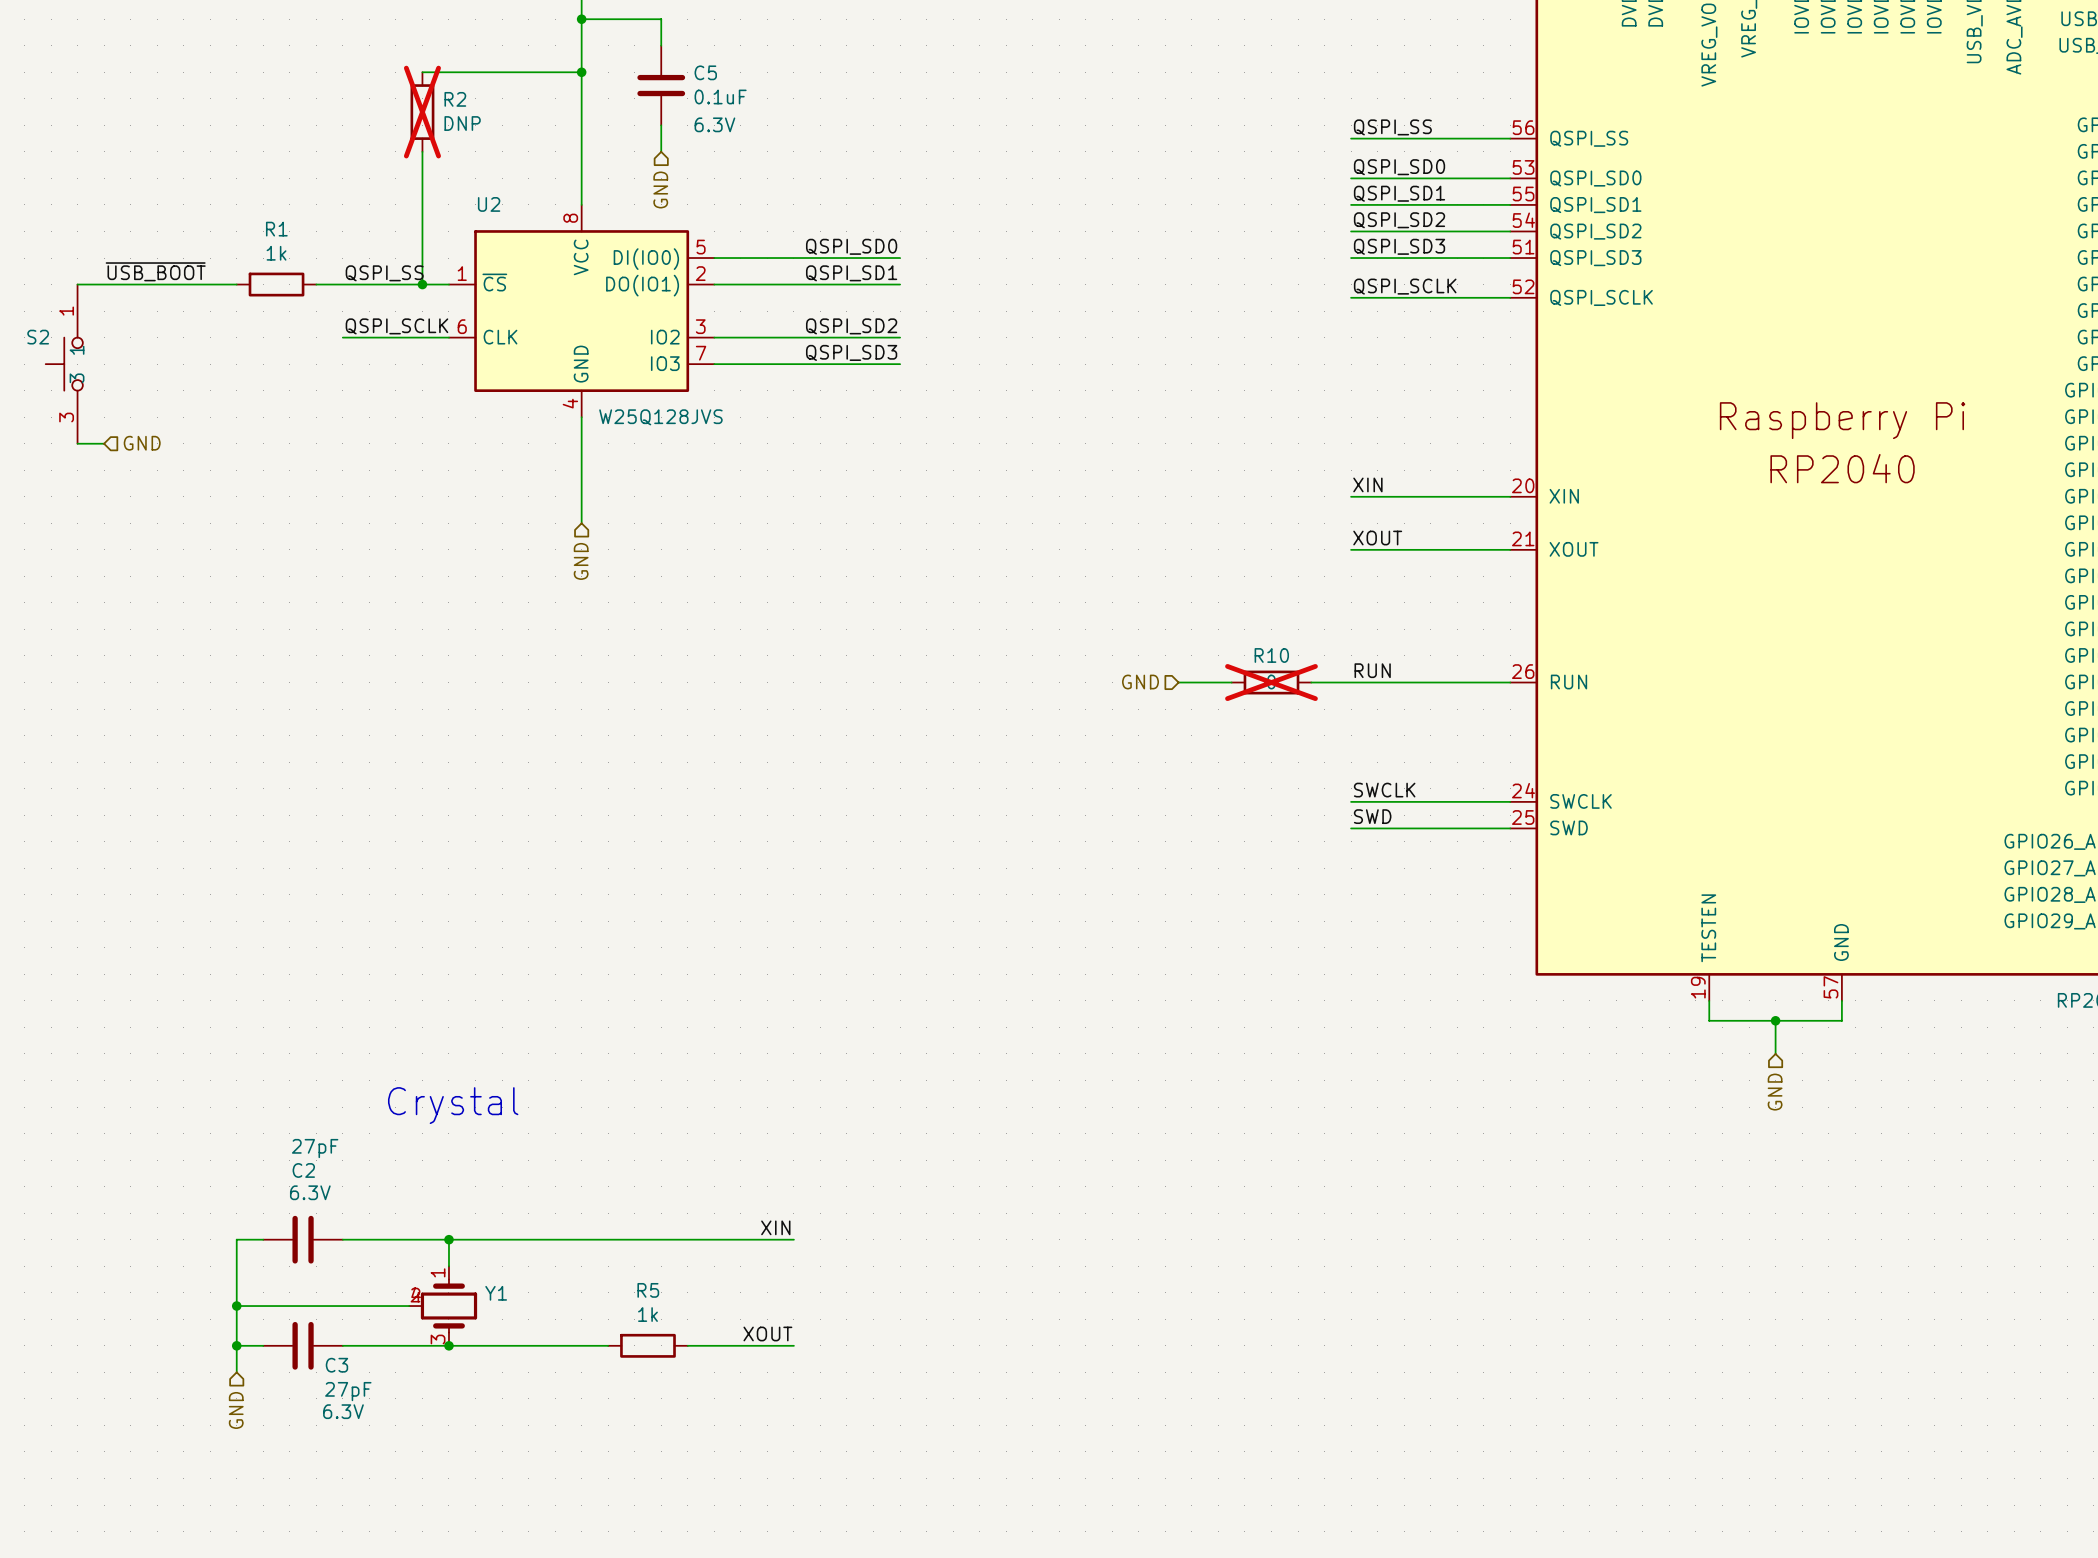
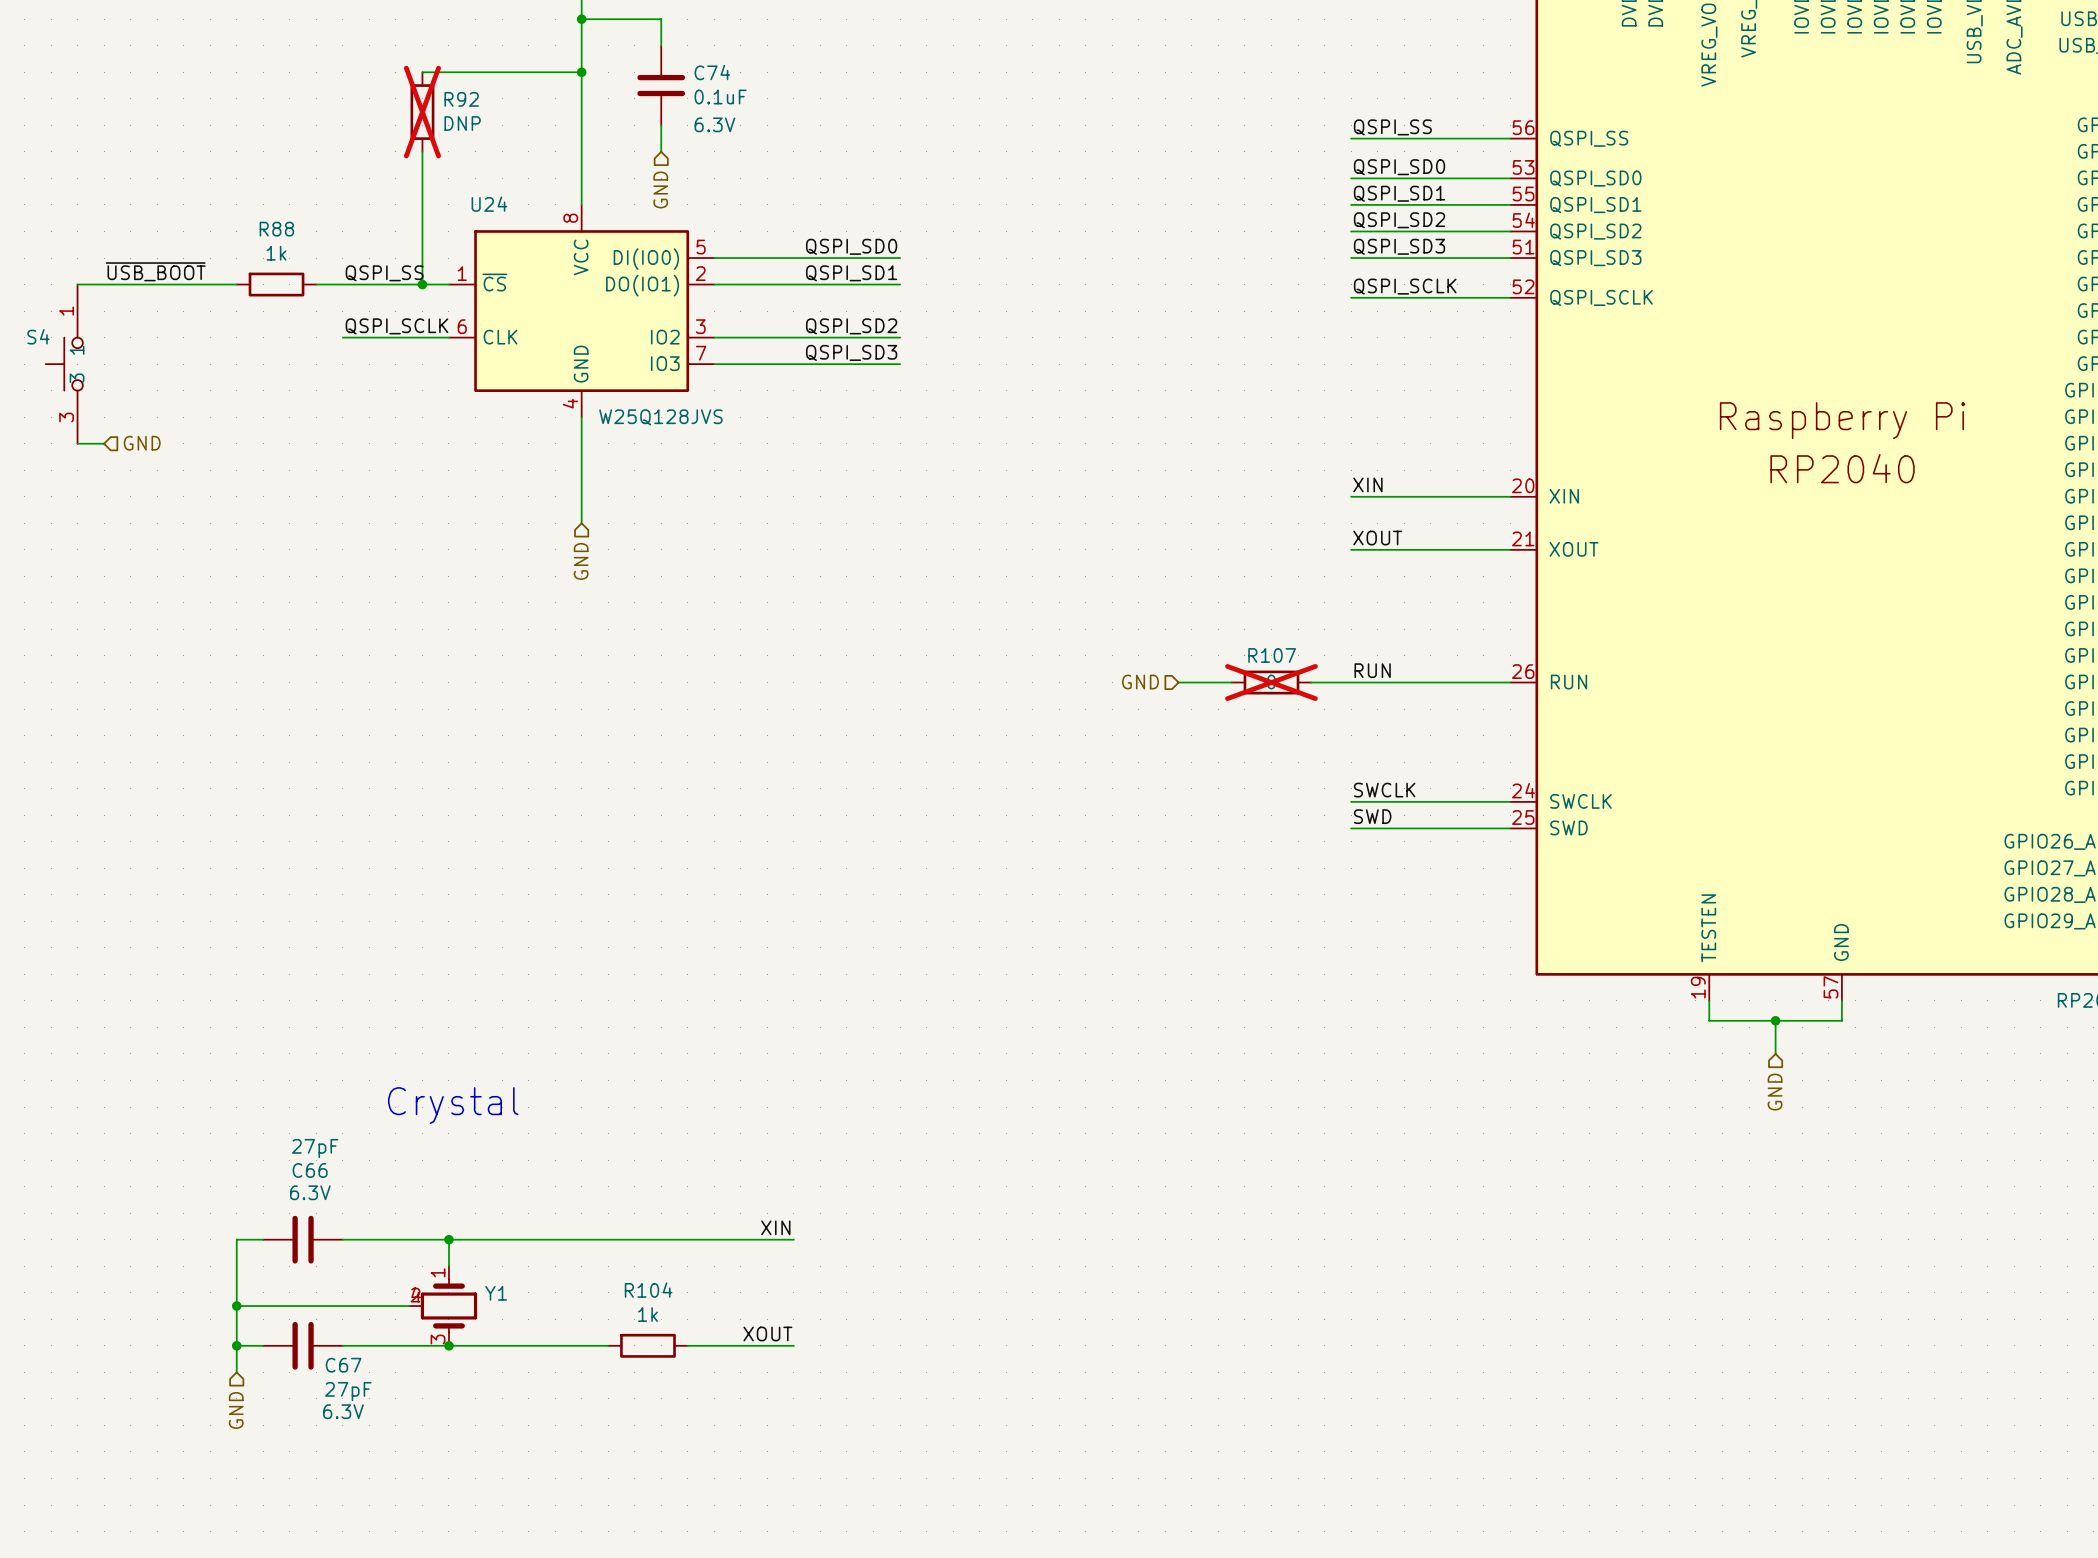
C5 name: C5 (705, 72) -> C74 (712, 72)
R2 name: R2 (455, 99) -> R92 (461, 99)
U2 name: U2 (489, 204) -> U24 (489, 204)
R1 name: R1 (276, 229) -> R88 (276, 229)
S2 name: S2 (38, 337) -> S4 (38, 336)
R10 name: R10 (1271, 655) -> R107 (1272, 655)
C2 name: C2 (303, 1170) -> C66 (310, 1170)
R5 name: R5 (648, 1290) -> R104 (648, 1290)
C3 name: C3 (336, 1365) -> C67 (343, 1365)

